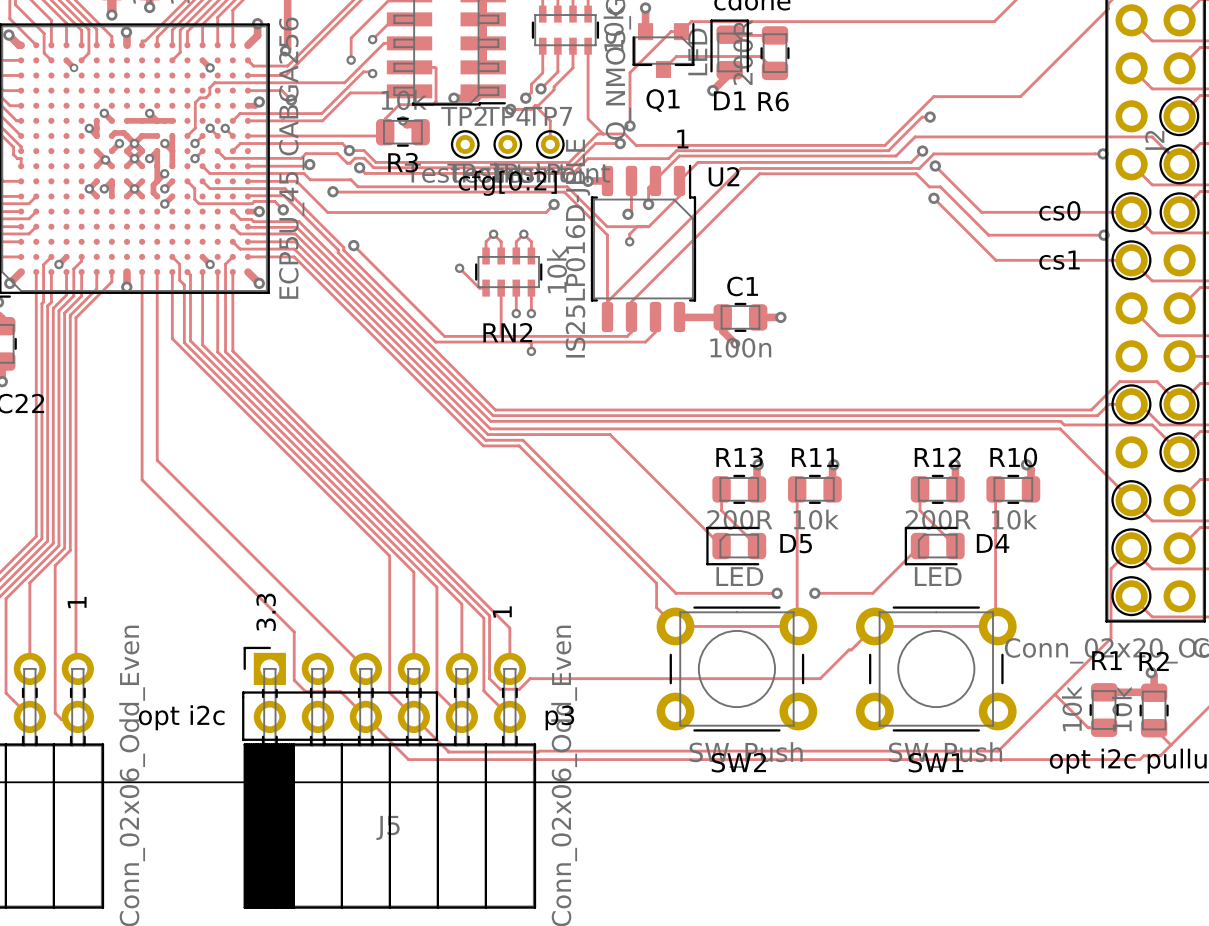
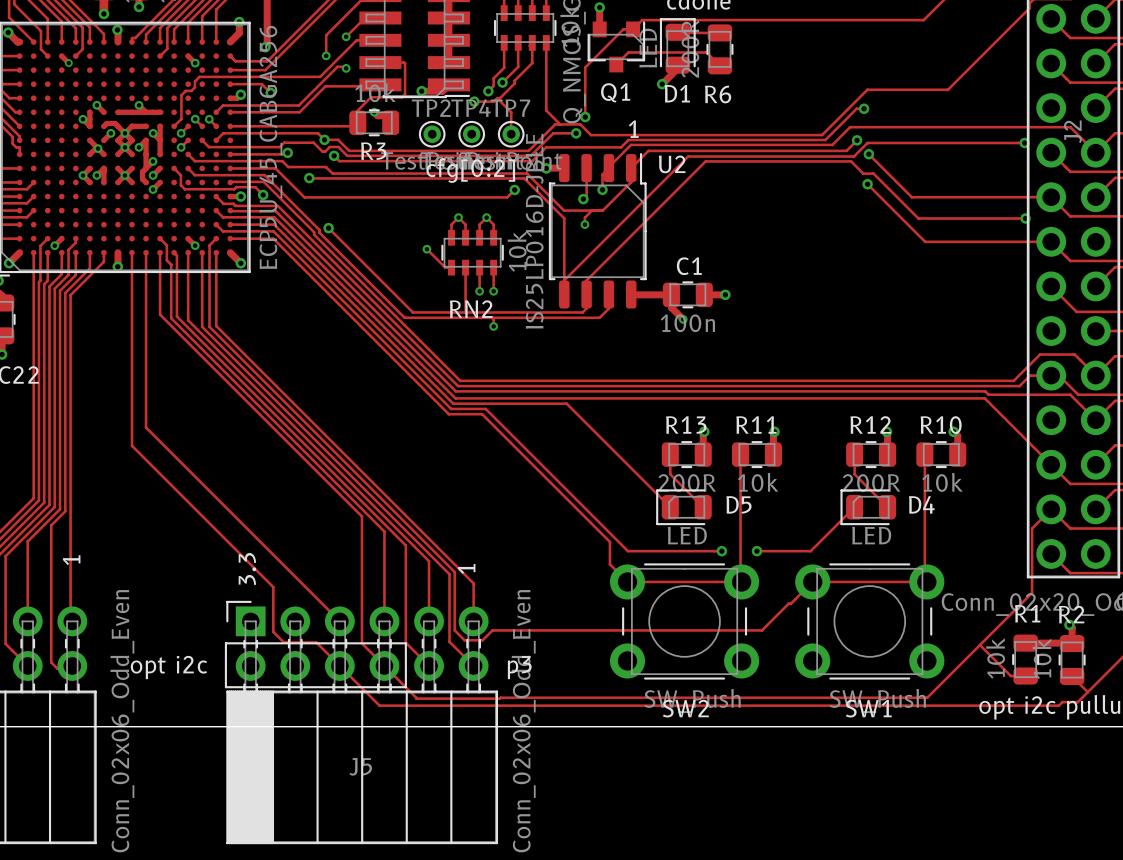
drawing: [1111, 96, 1200, 281] -> none
text: cs0 (1059, 210) -> none
text: cs1 (1059, 260) -> none
drawing: [1111, 384, 1200, 617] -> none

